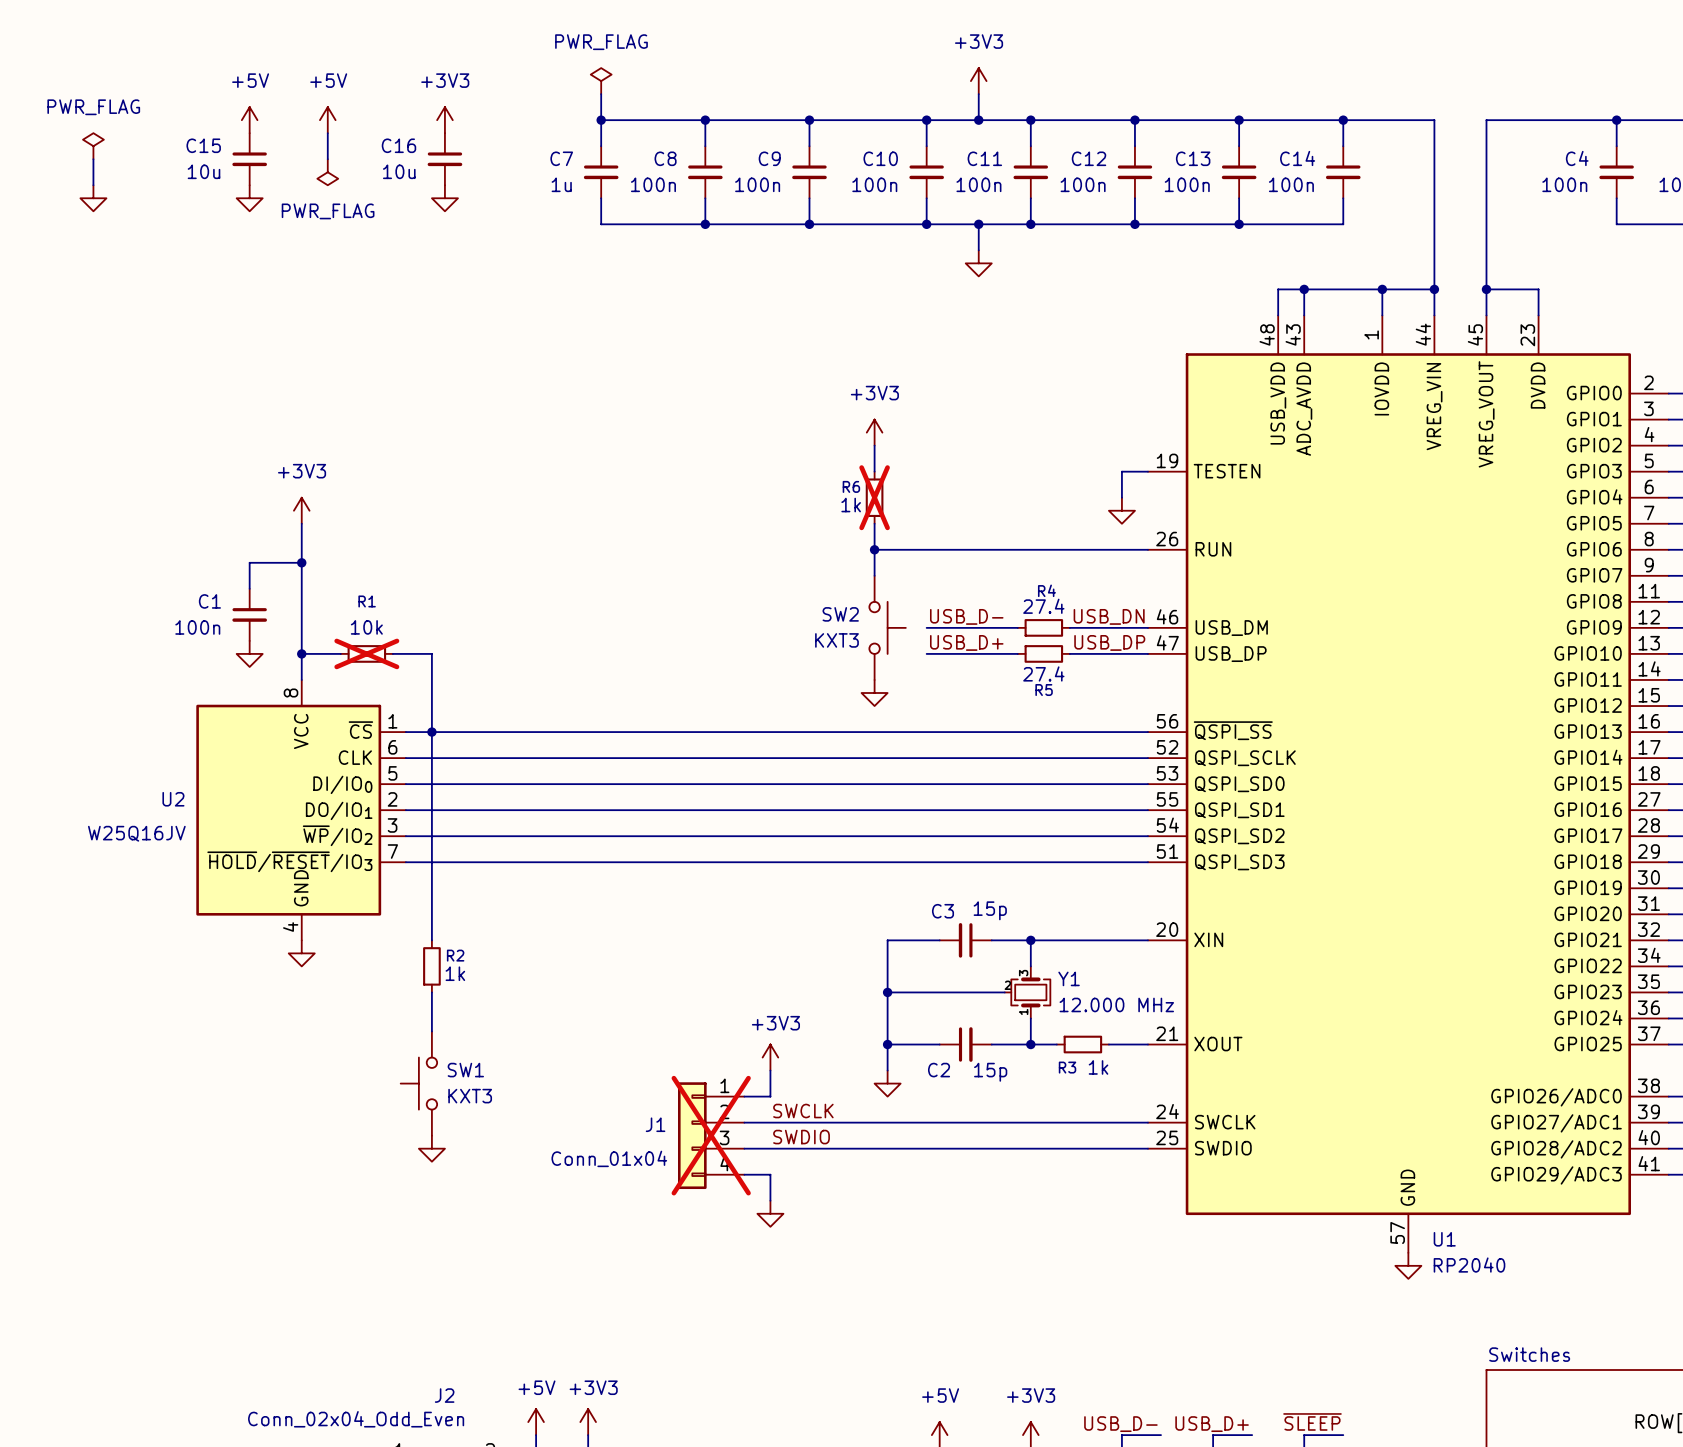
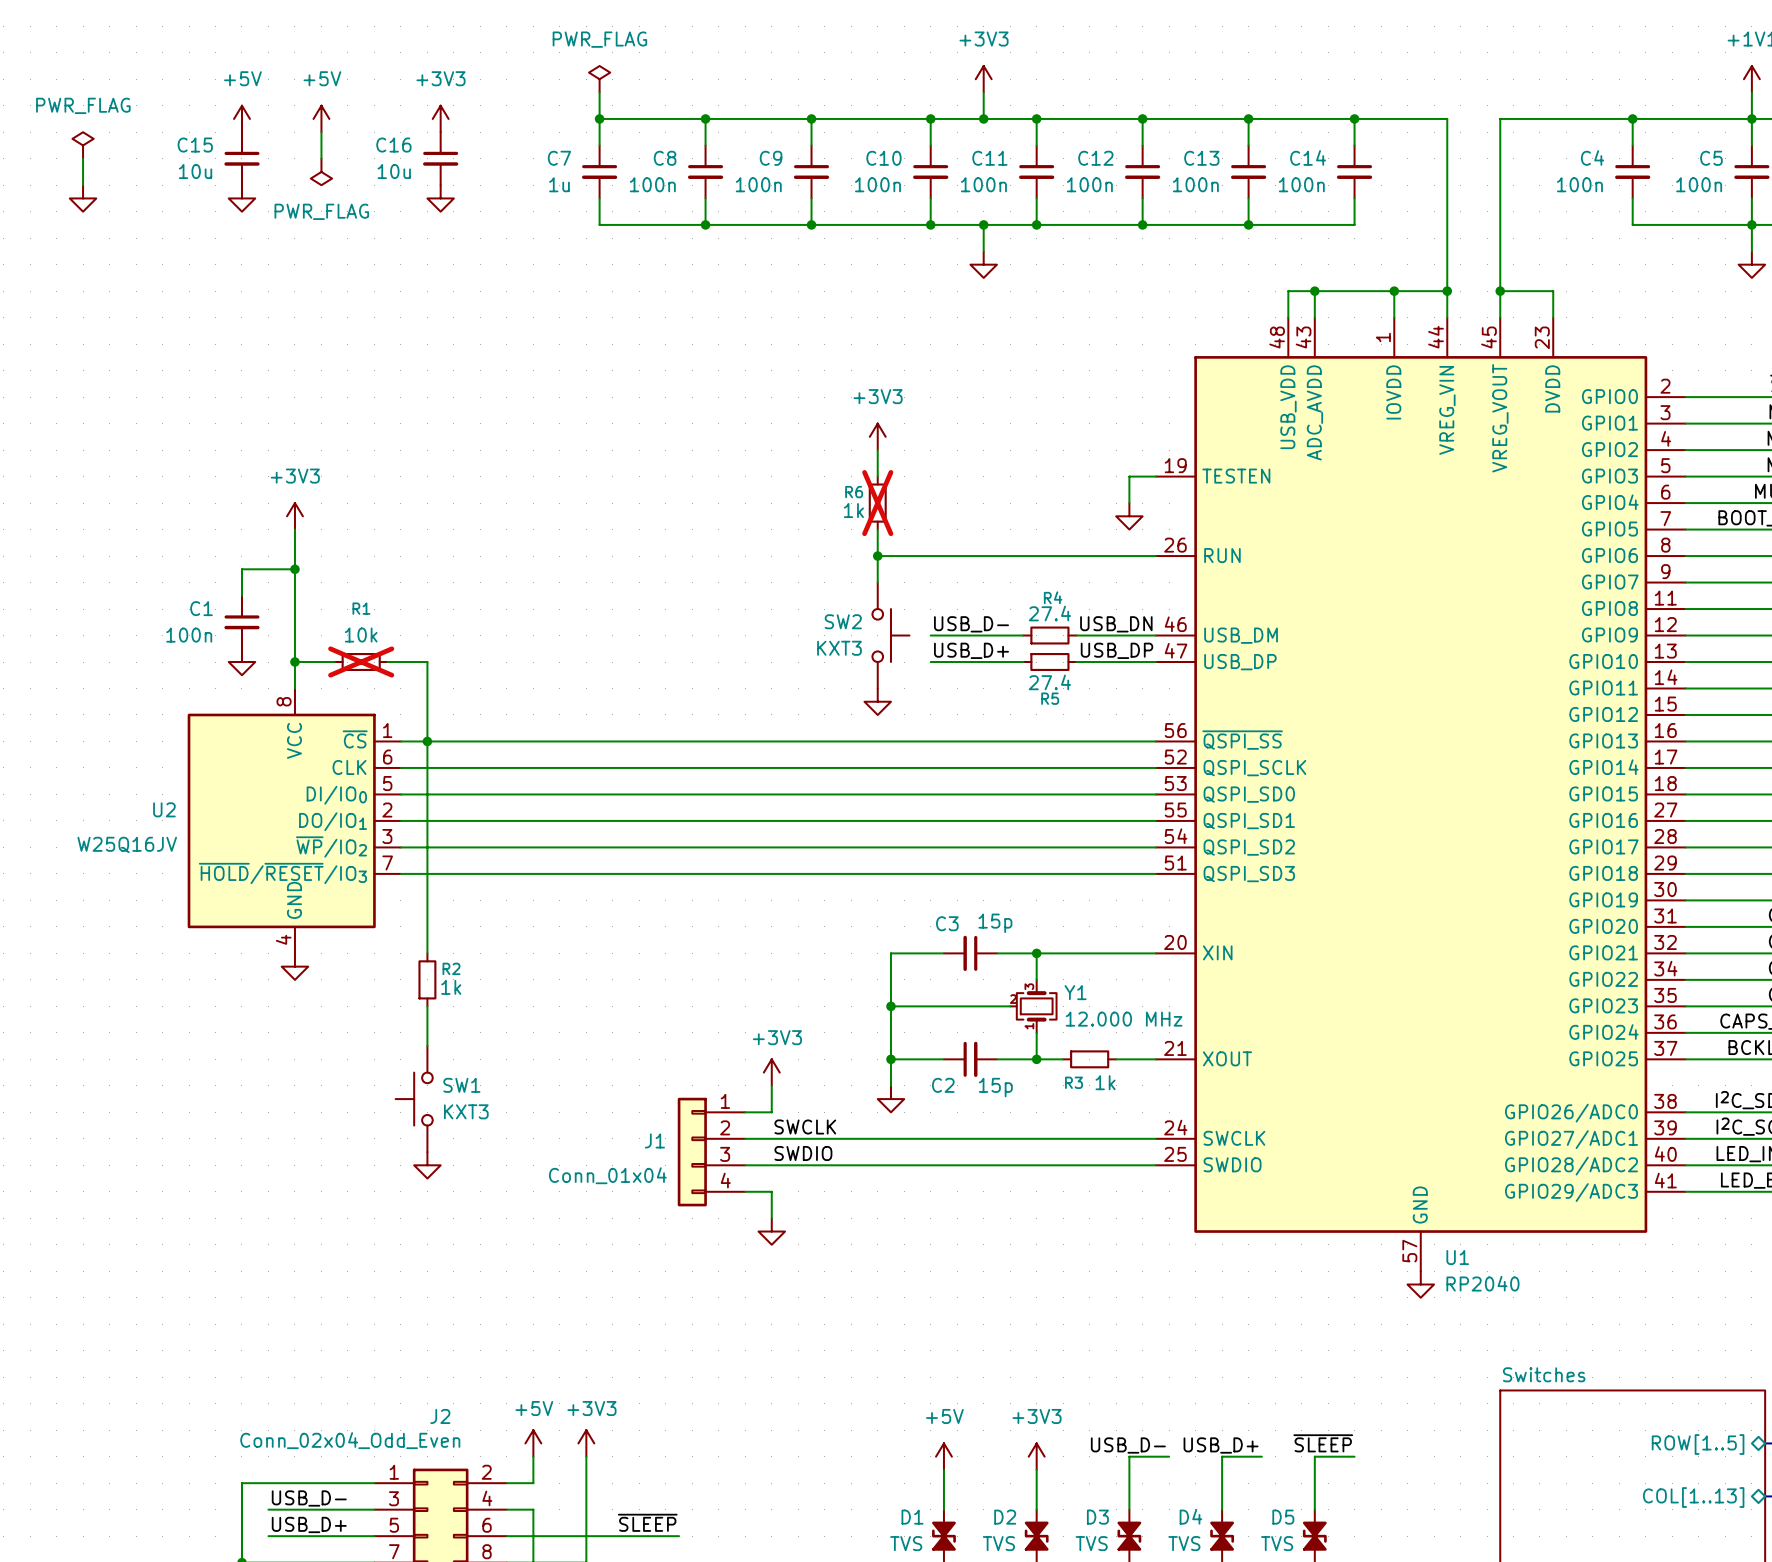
J1 do-not-place cross: (711, 1135) -> none

